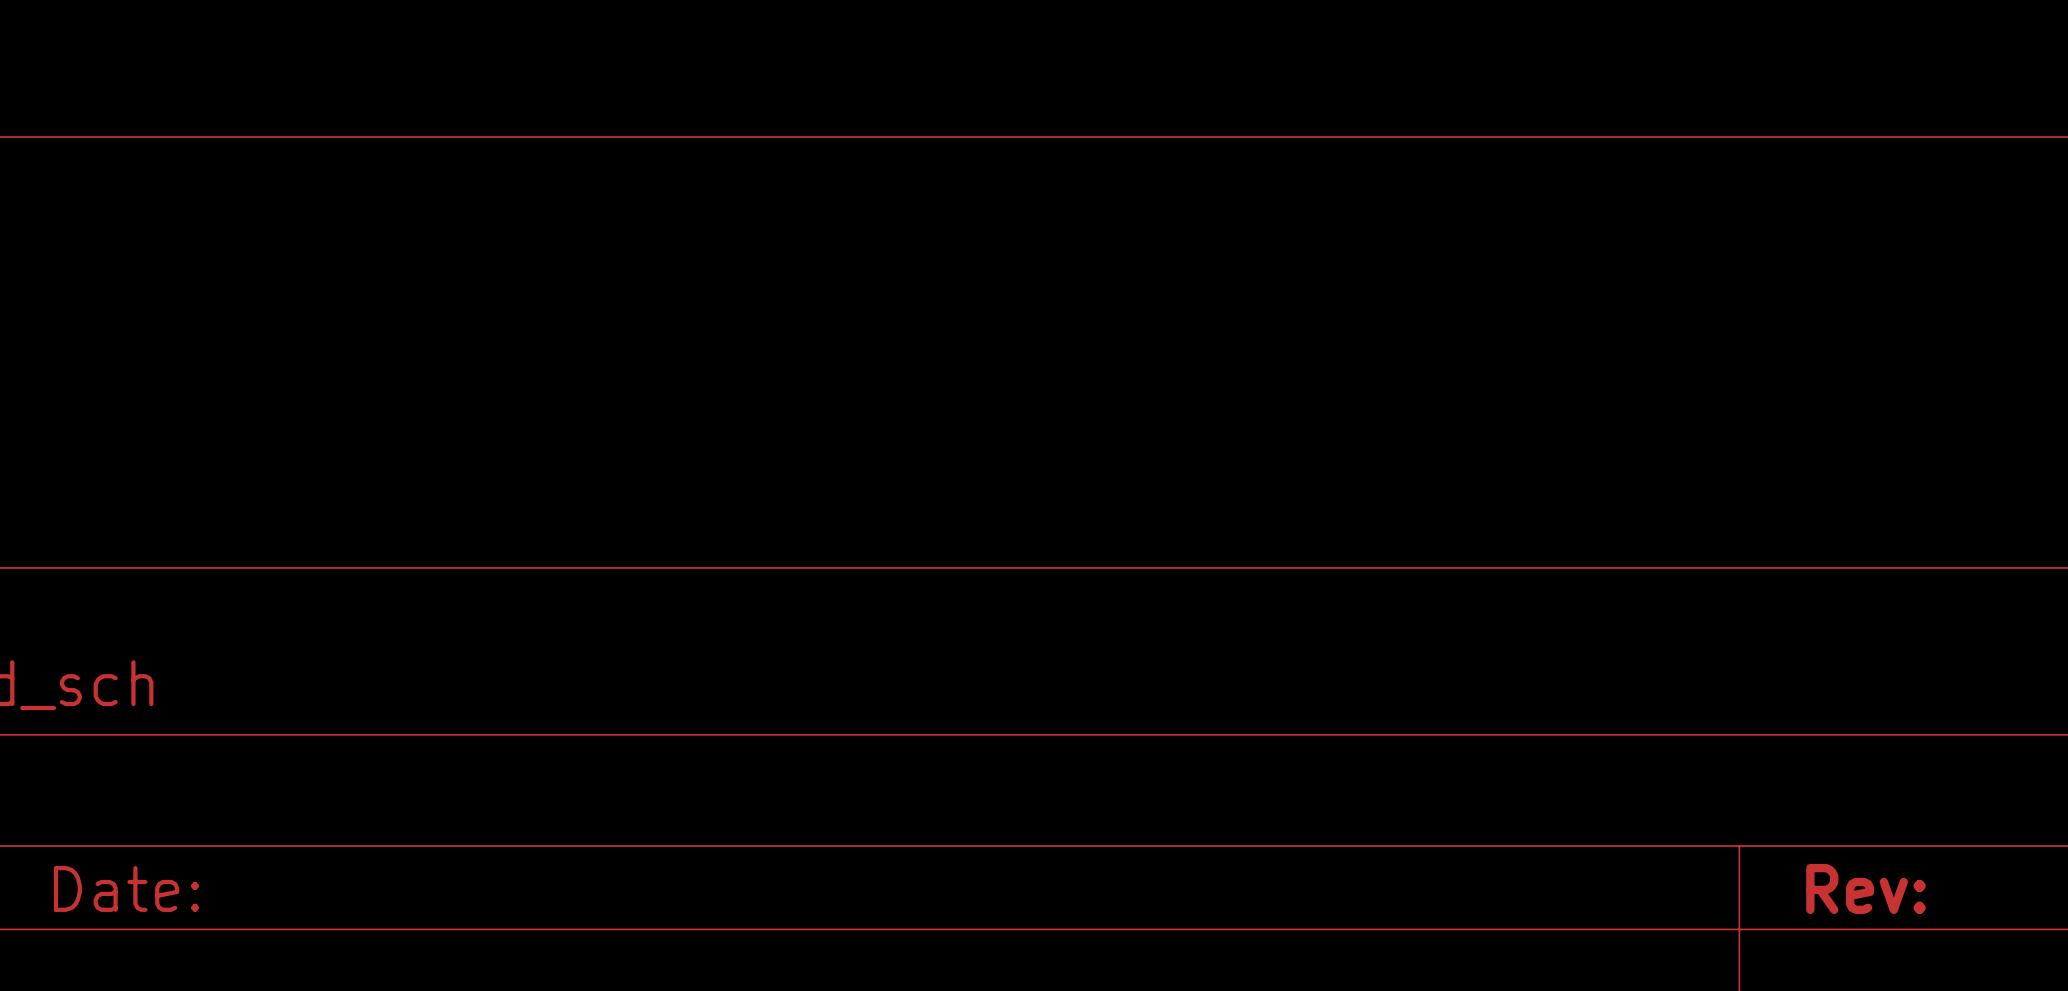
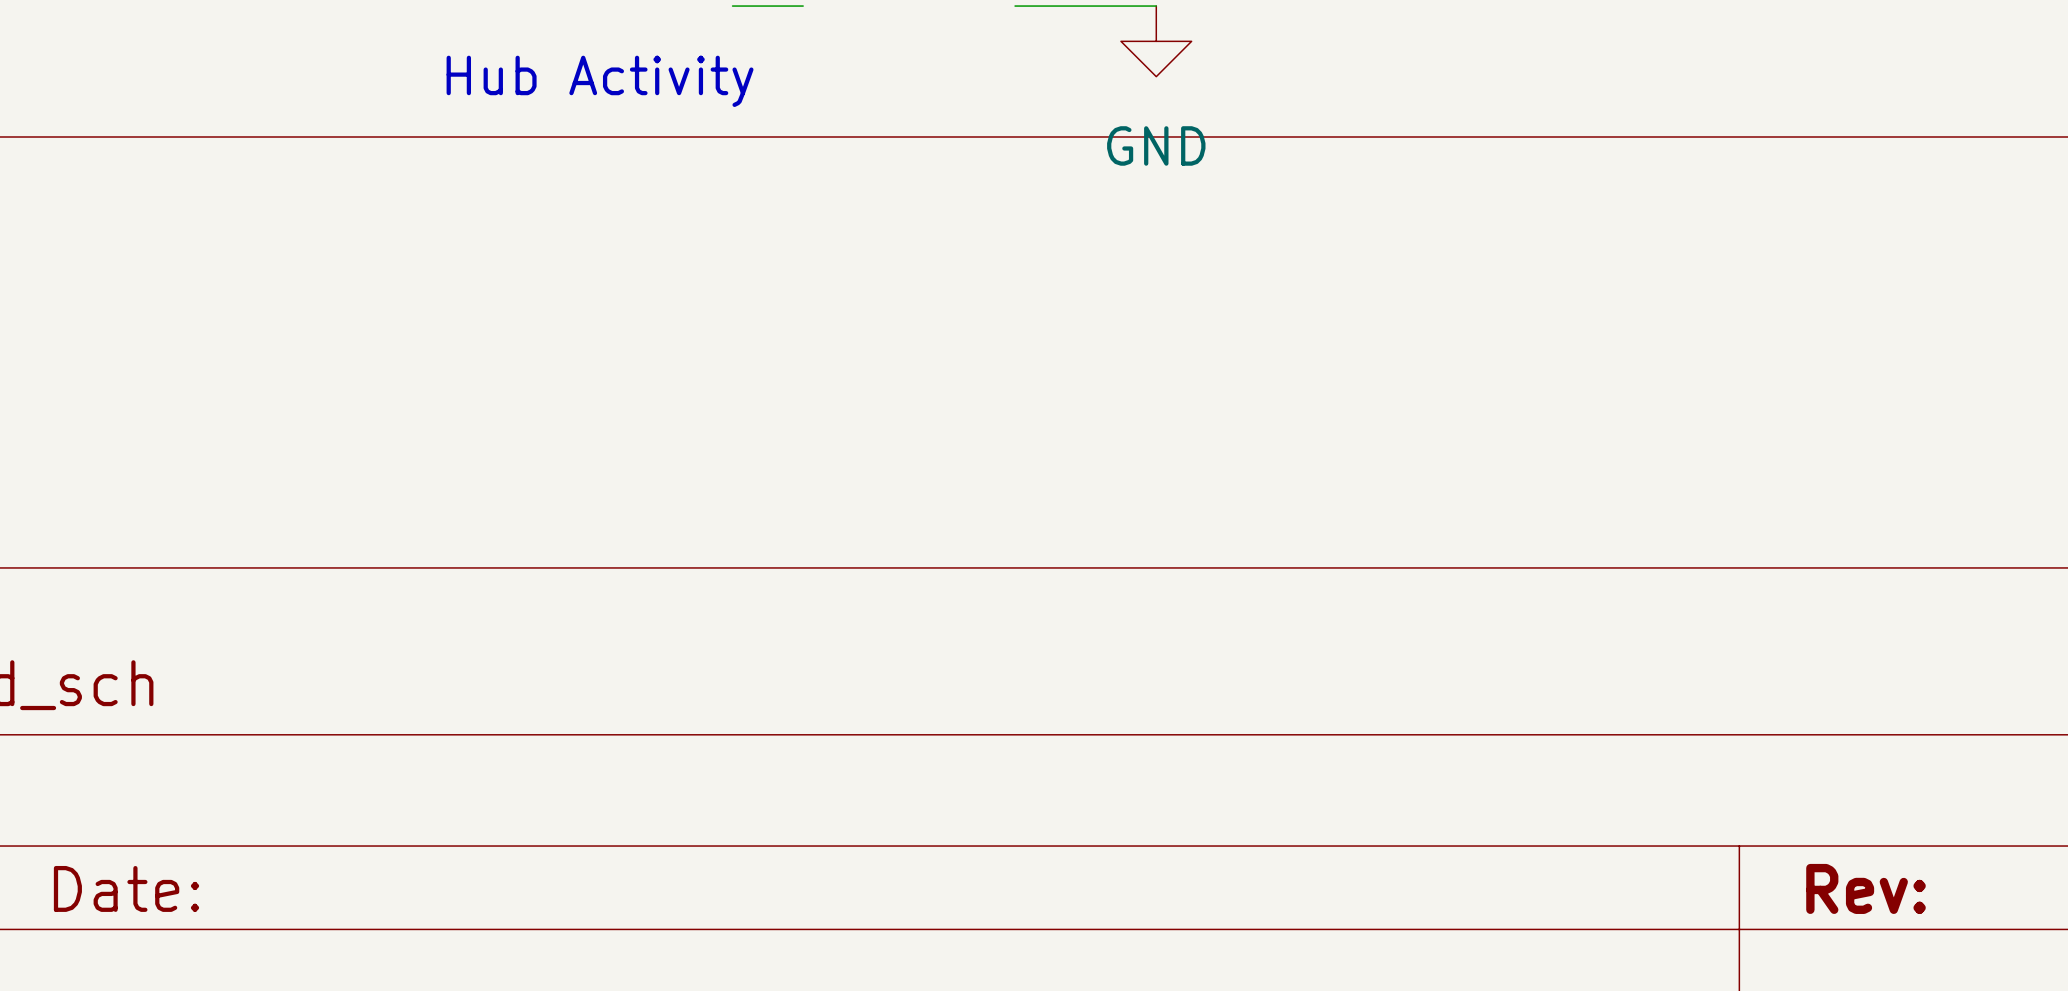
wire: none -> (732, 6) (803, 6)
wire: none -> (1015, 6) (1156, 6)
power symbol: none -> GND (1156, 41)
text: none -> Hub Activity (600, 81)

